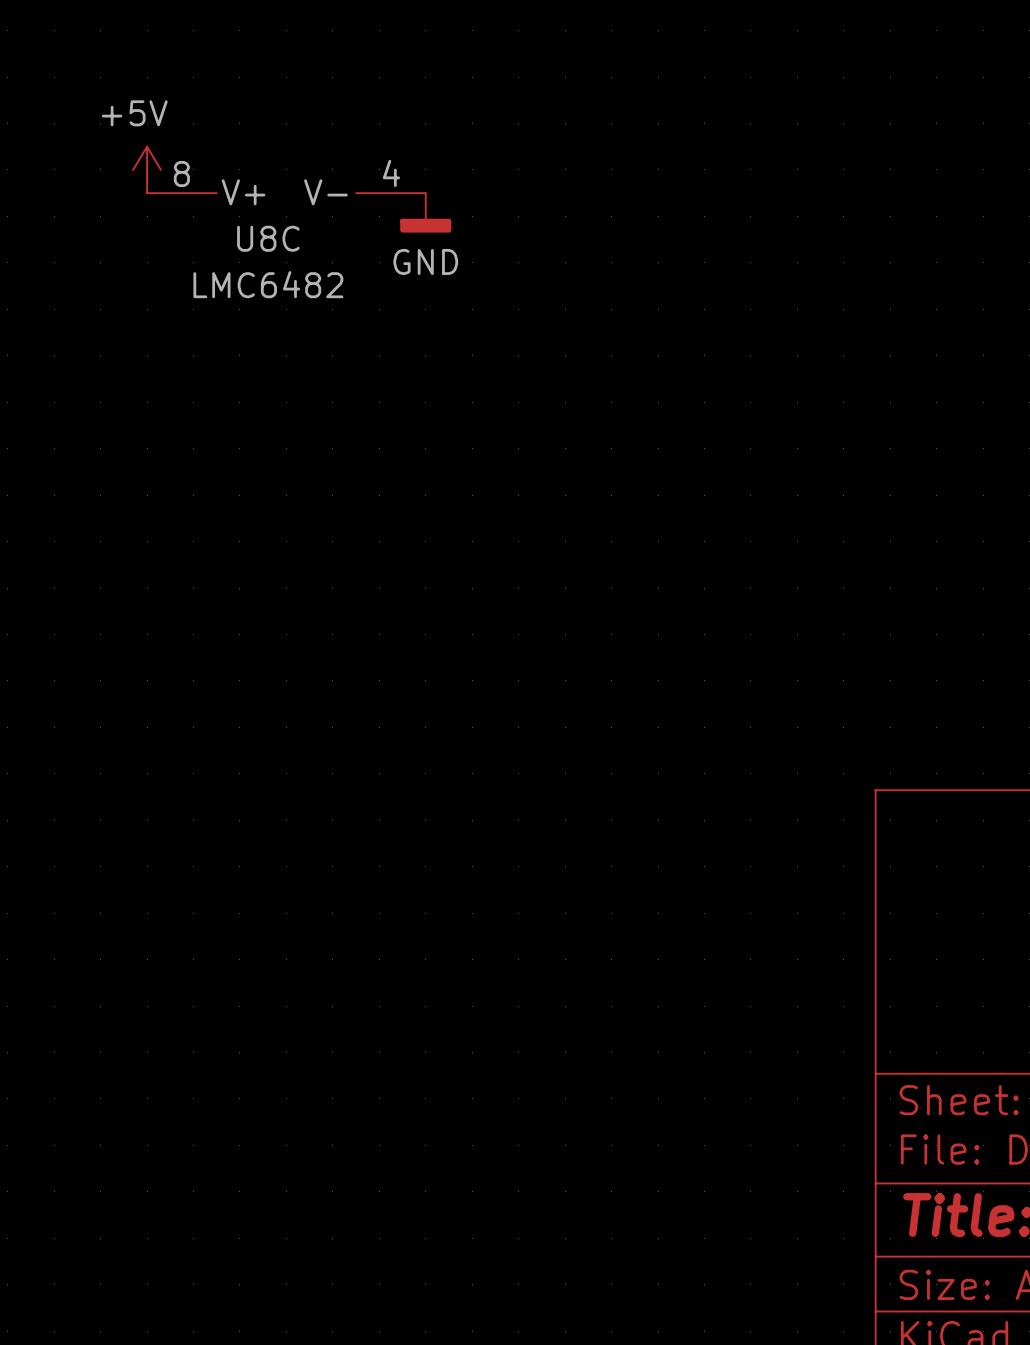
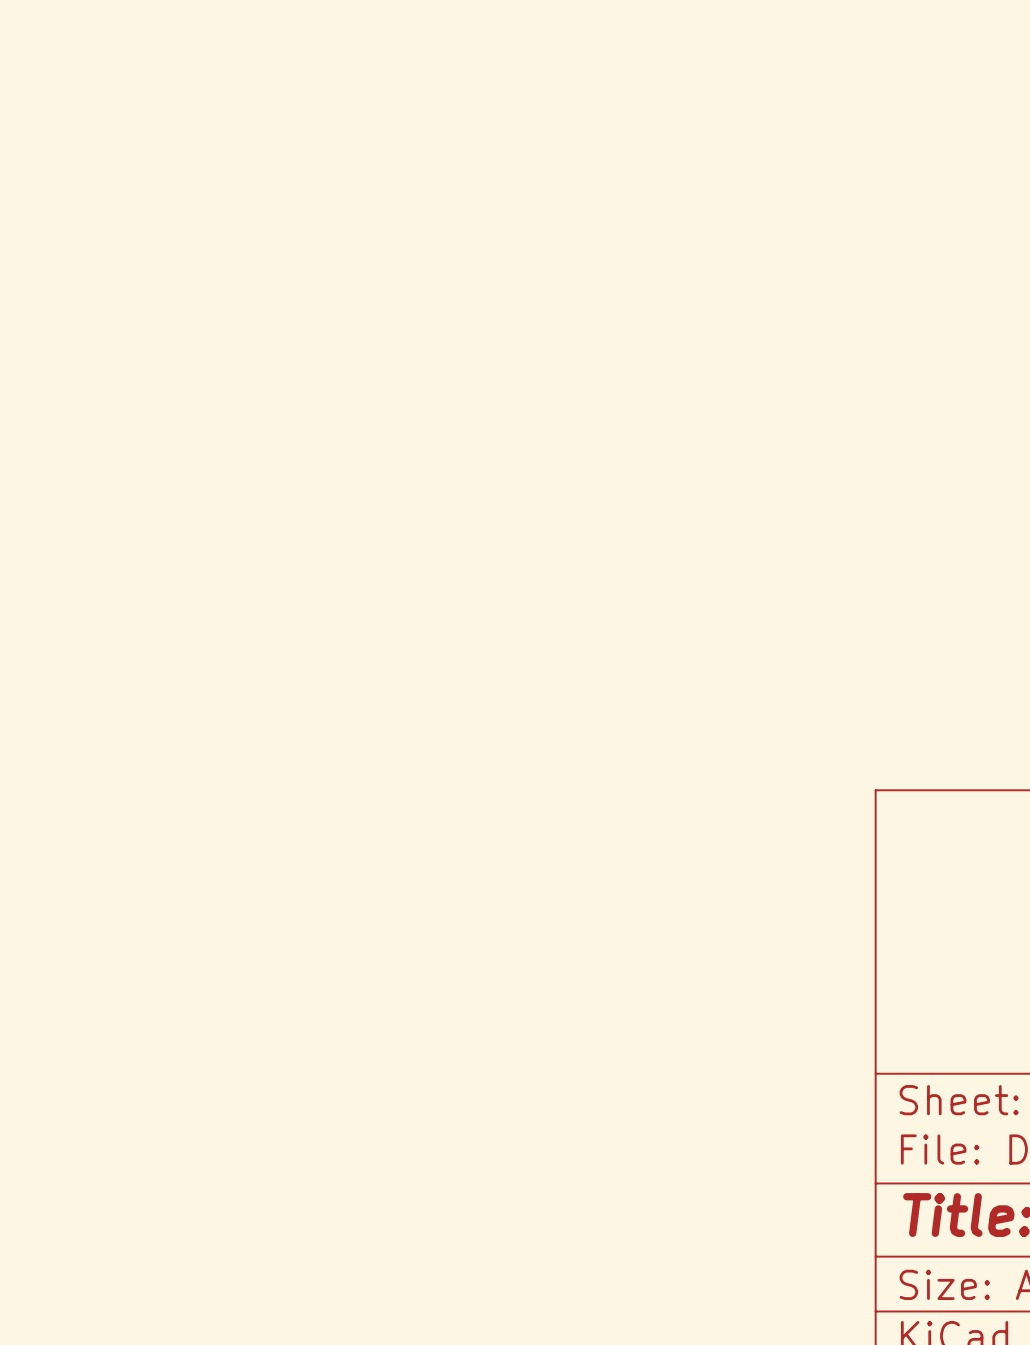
power symbol: +5V (147, 169) -> none
U8C: LMC6482 (286, 193) -> none
power symbol: GND (425, 212) -> none

